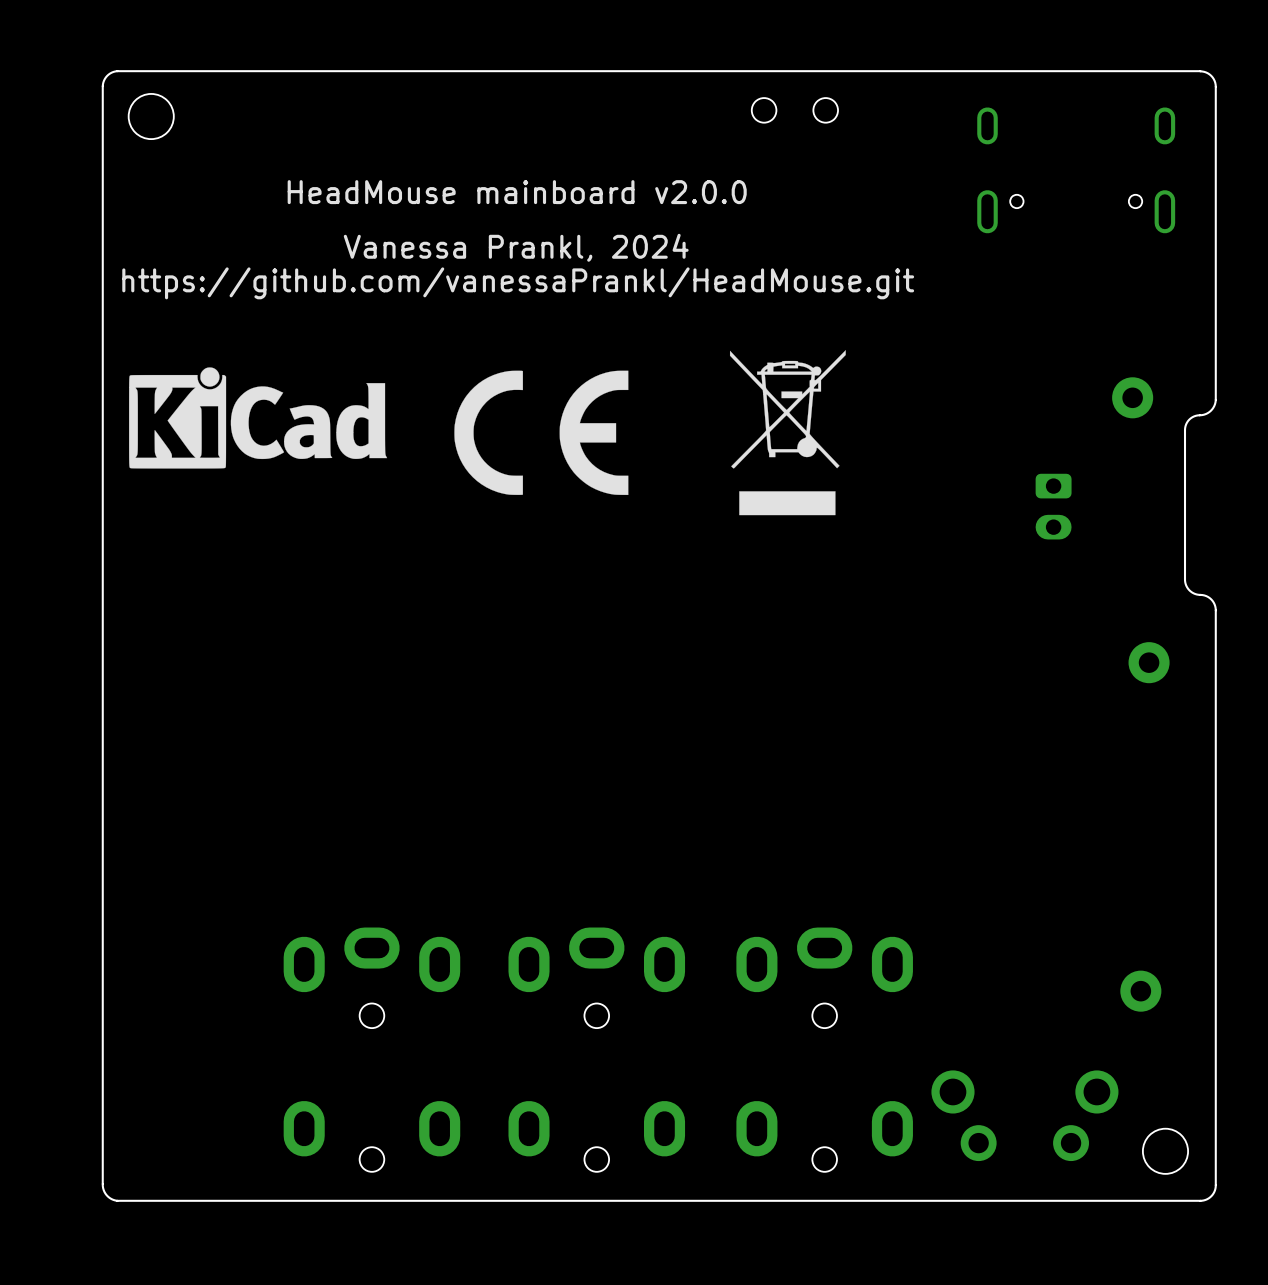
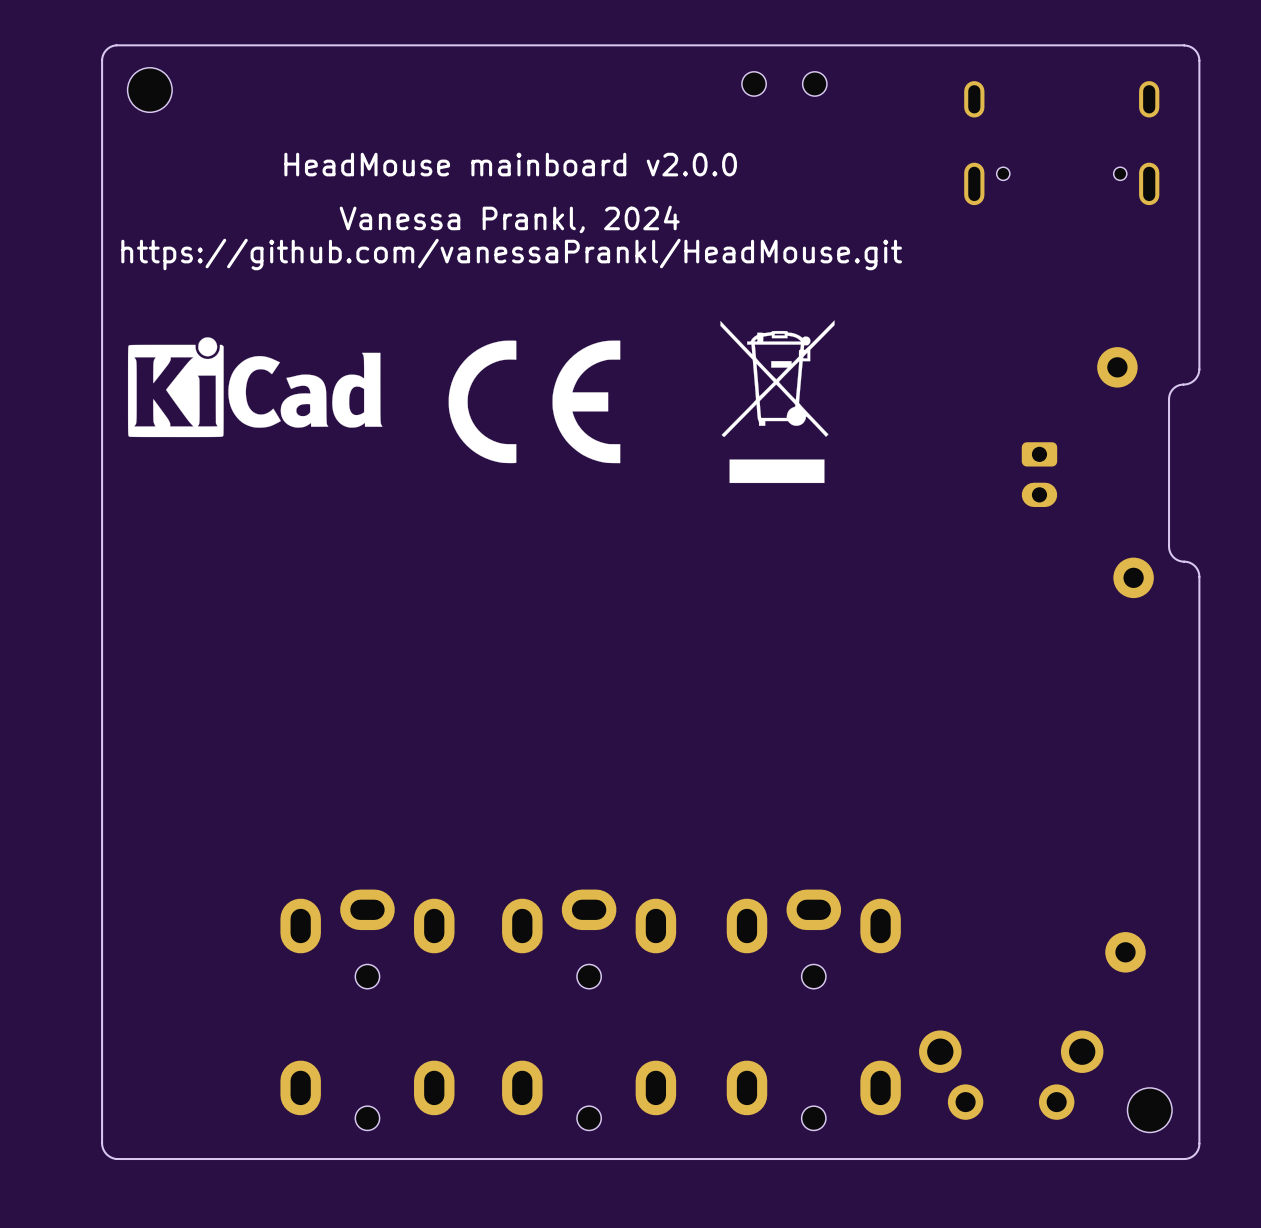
part position: (1149, 662) -> (1133, 577)

